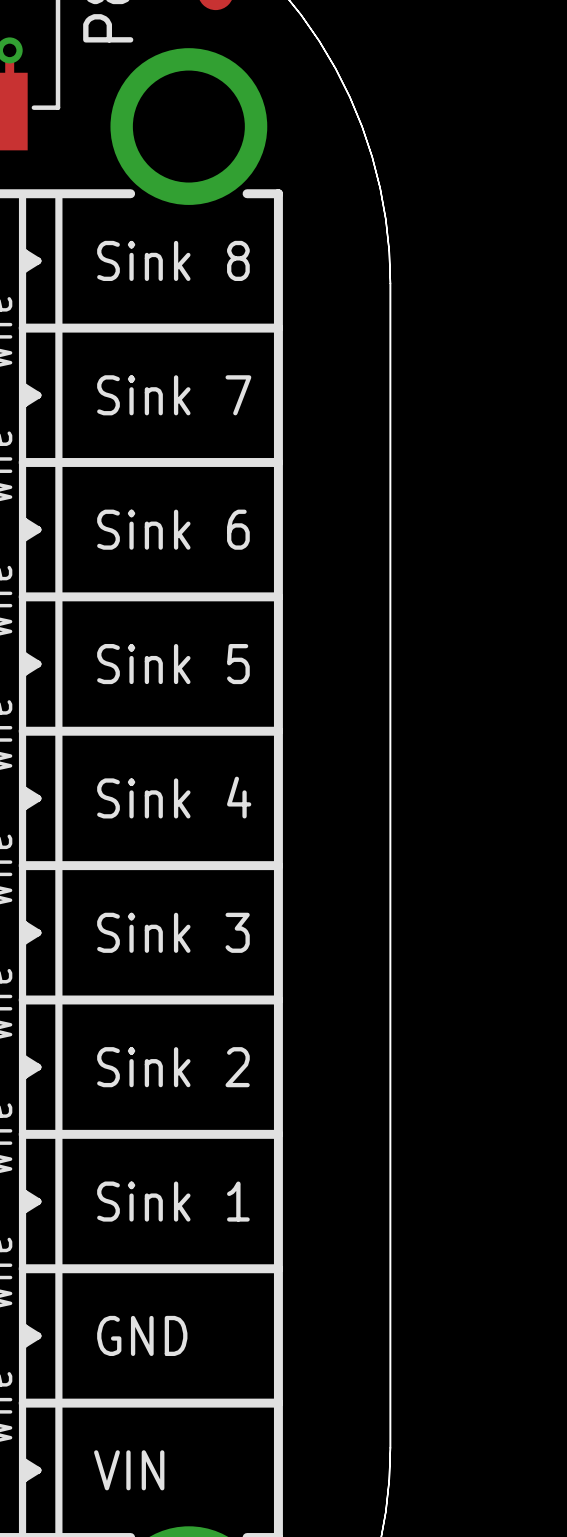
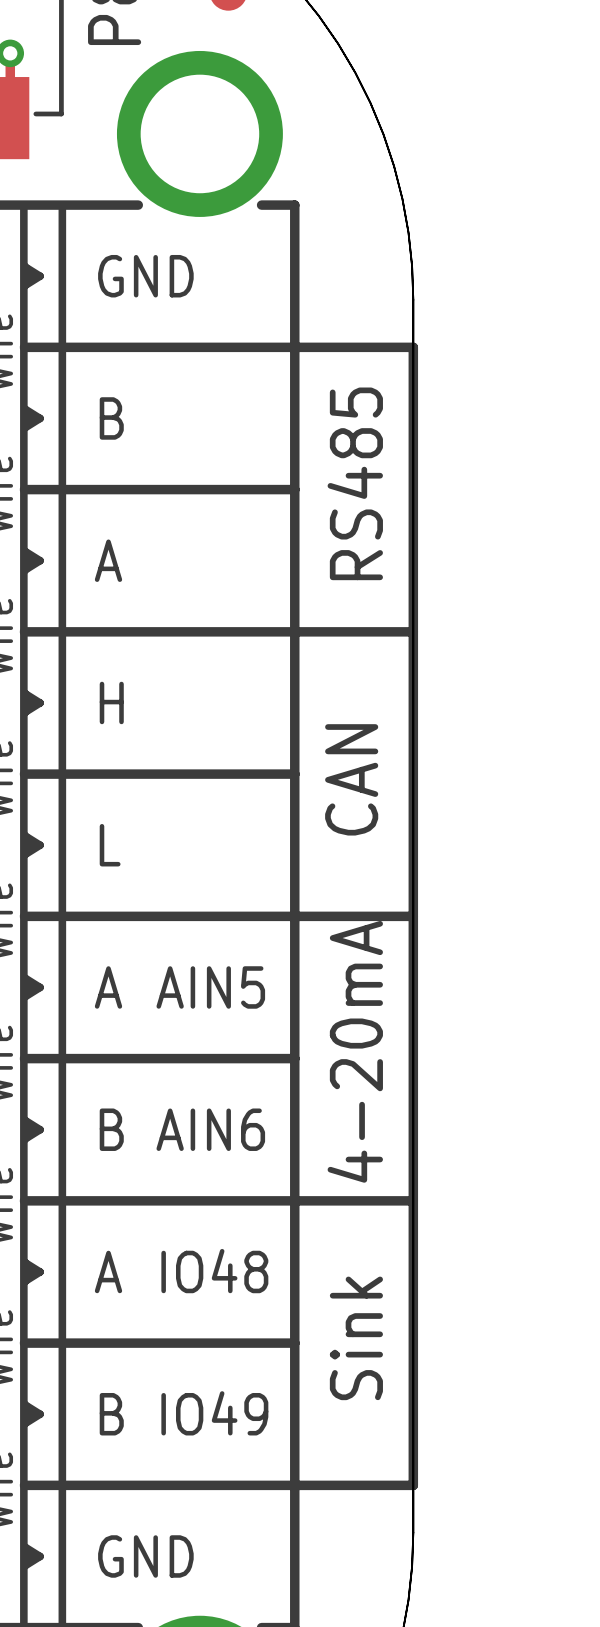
text: Sink (143, 260) -> GND (145, 276)
text: 8 (238, 260) -> none
line: none -> (294, 347) (413, 347) (413, 1485) (294, 1485)
text: Sink (143, 395) -> B (111, 418)
text: 7 (238, 395) -> none
text: none -> RS485 (355, 483)
text: Sink (143, 529) -> A (108, 560)
text: 6 (238, 529) -> none
line: none -> (294, 631) (413, 631)
text: Sink (143, 664) -> H (111, 702)
text: 5 (238, 664) -> none
text: none -> CAN (351, 779)
text: 4 (239, 797) -> none
text: Sink (143, 798) -> L (110, 845)
line: none -> (294, 916) (413, 916)
text: Sink (143, 932) -> A (108, 987)
text: none -> AIN5 (210, 987)
text: 3 (237, 932) -> none
text: none -> 4-20mA (355, 1051)
text: Sink (143, 1067) -> B (111, 1129)
text: none -> AIN6 (210, 1129)
text: 2 (237, 1067) -> none
line: none -> (294, 1200) (413, 1200)
text: none -> IO48 (214, 1271)
text: Sink (143, 1201) -> A (108, 1271)
text: 1 (238, 1201) -> none
text: none -> Sink (356, 1338)
text: none -> B (111, 1414)
text position: GND (142, 1335) -> GND (145, 1556)
text: none -> IO49 (214, 1413)
text: VIN (129, 1470) -> none

